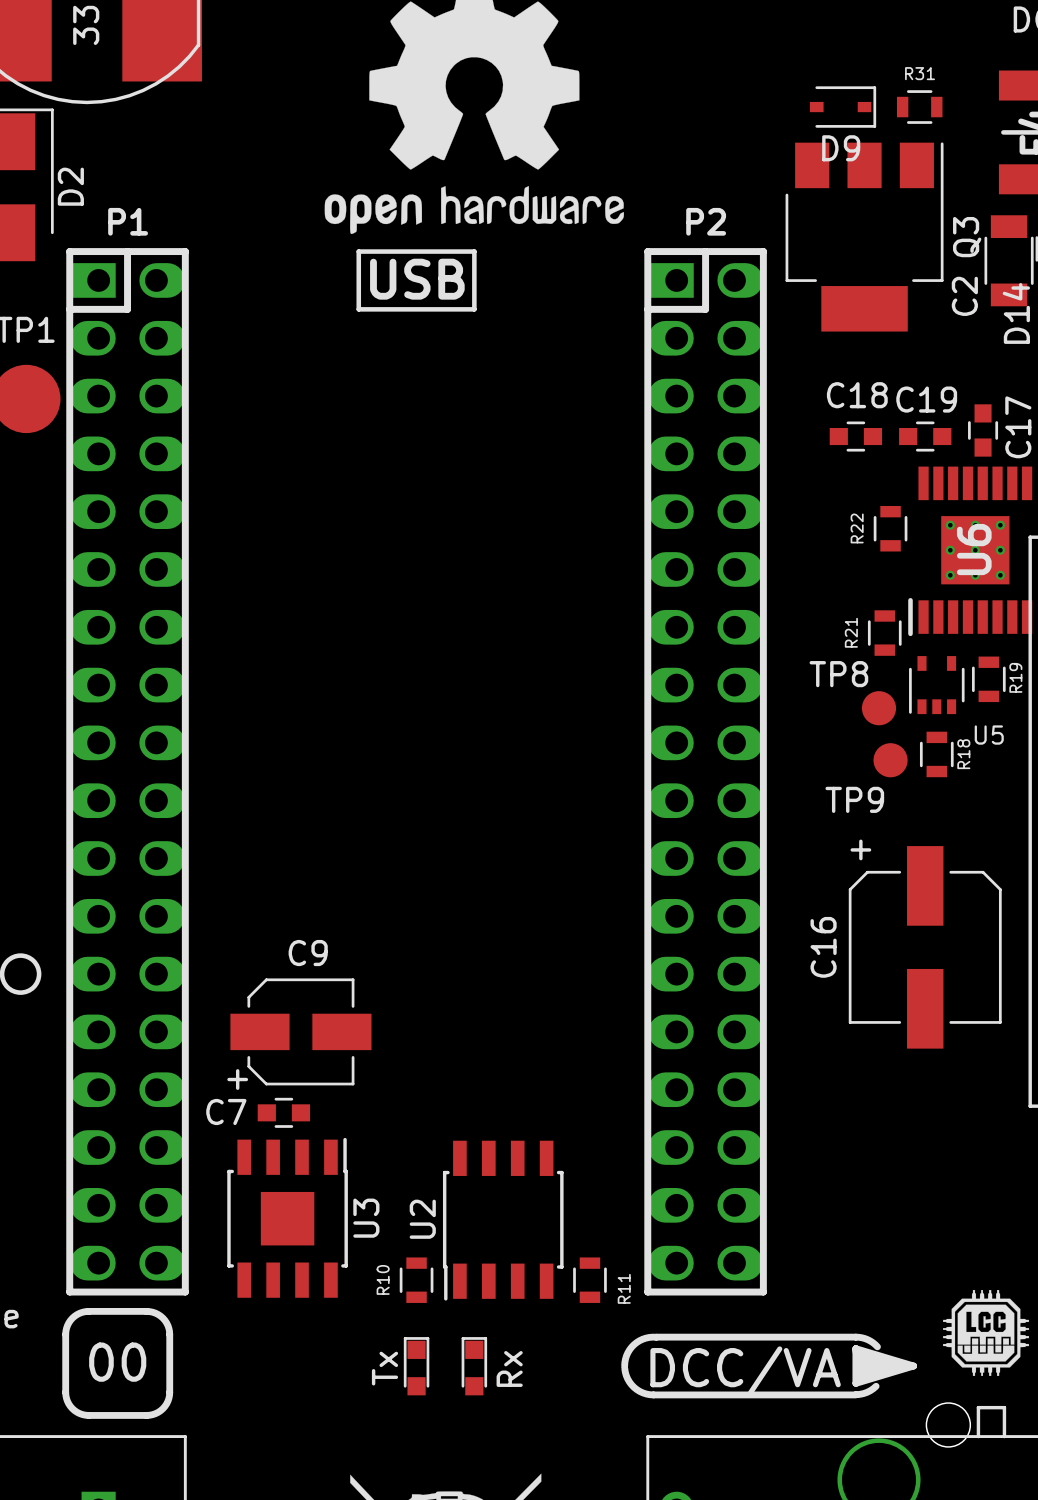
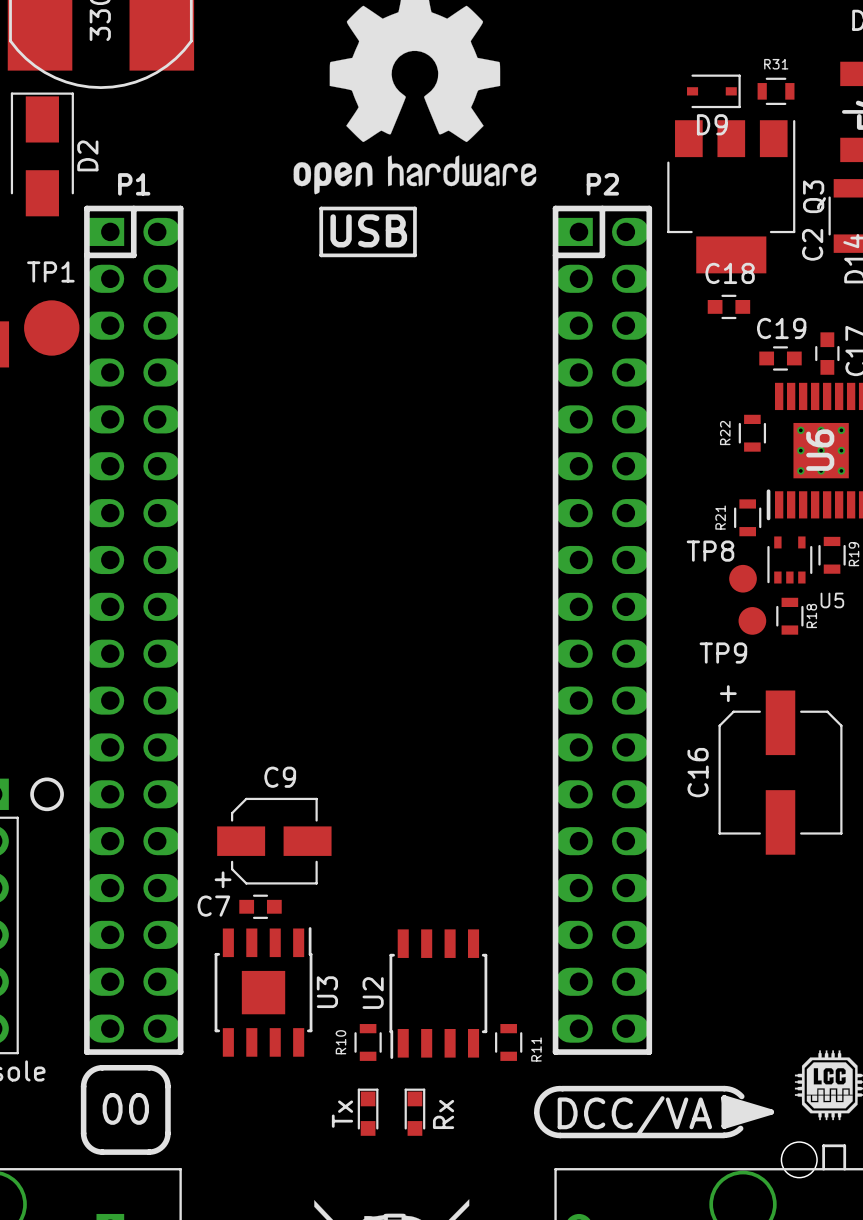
C18 position: (855, 436) -> (728, 306)

